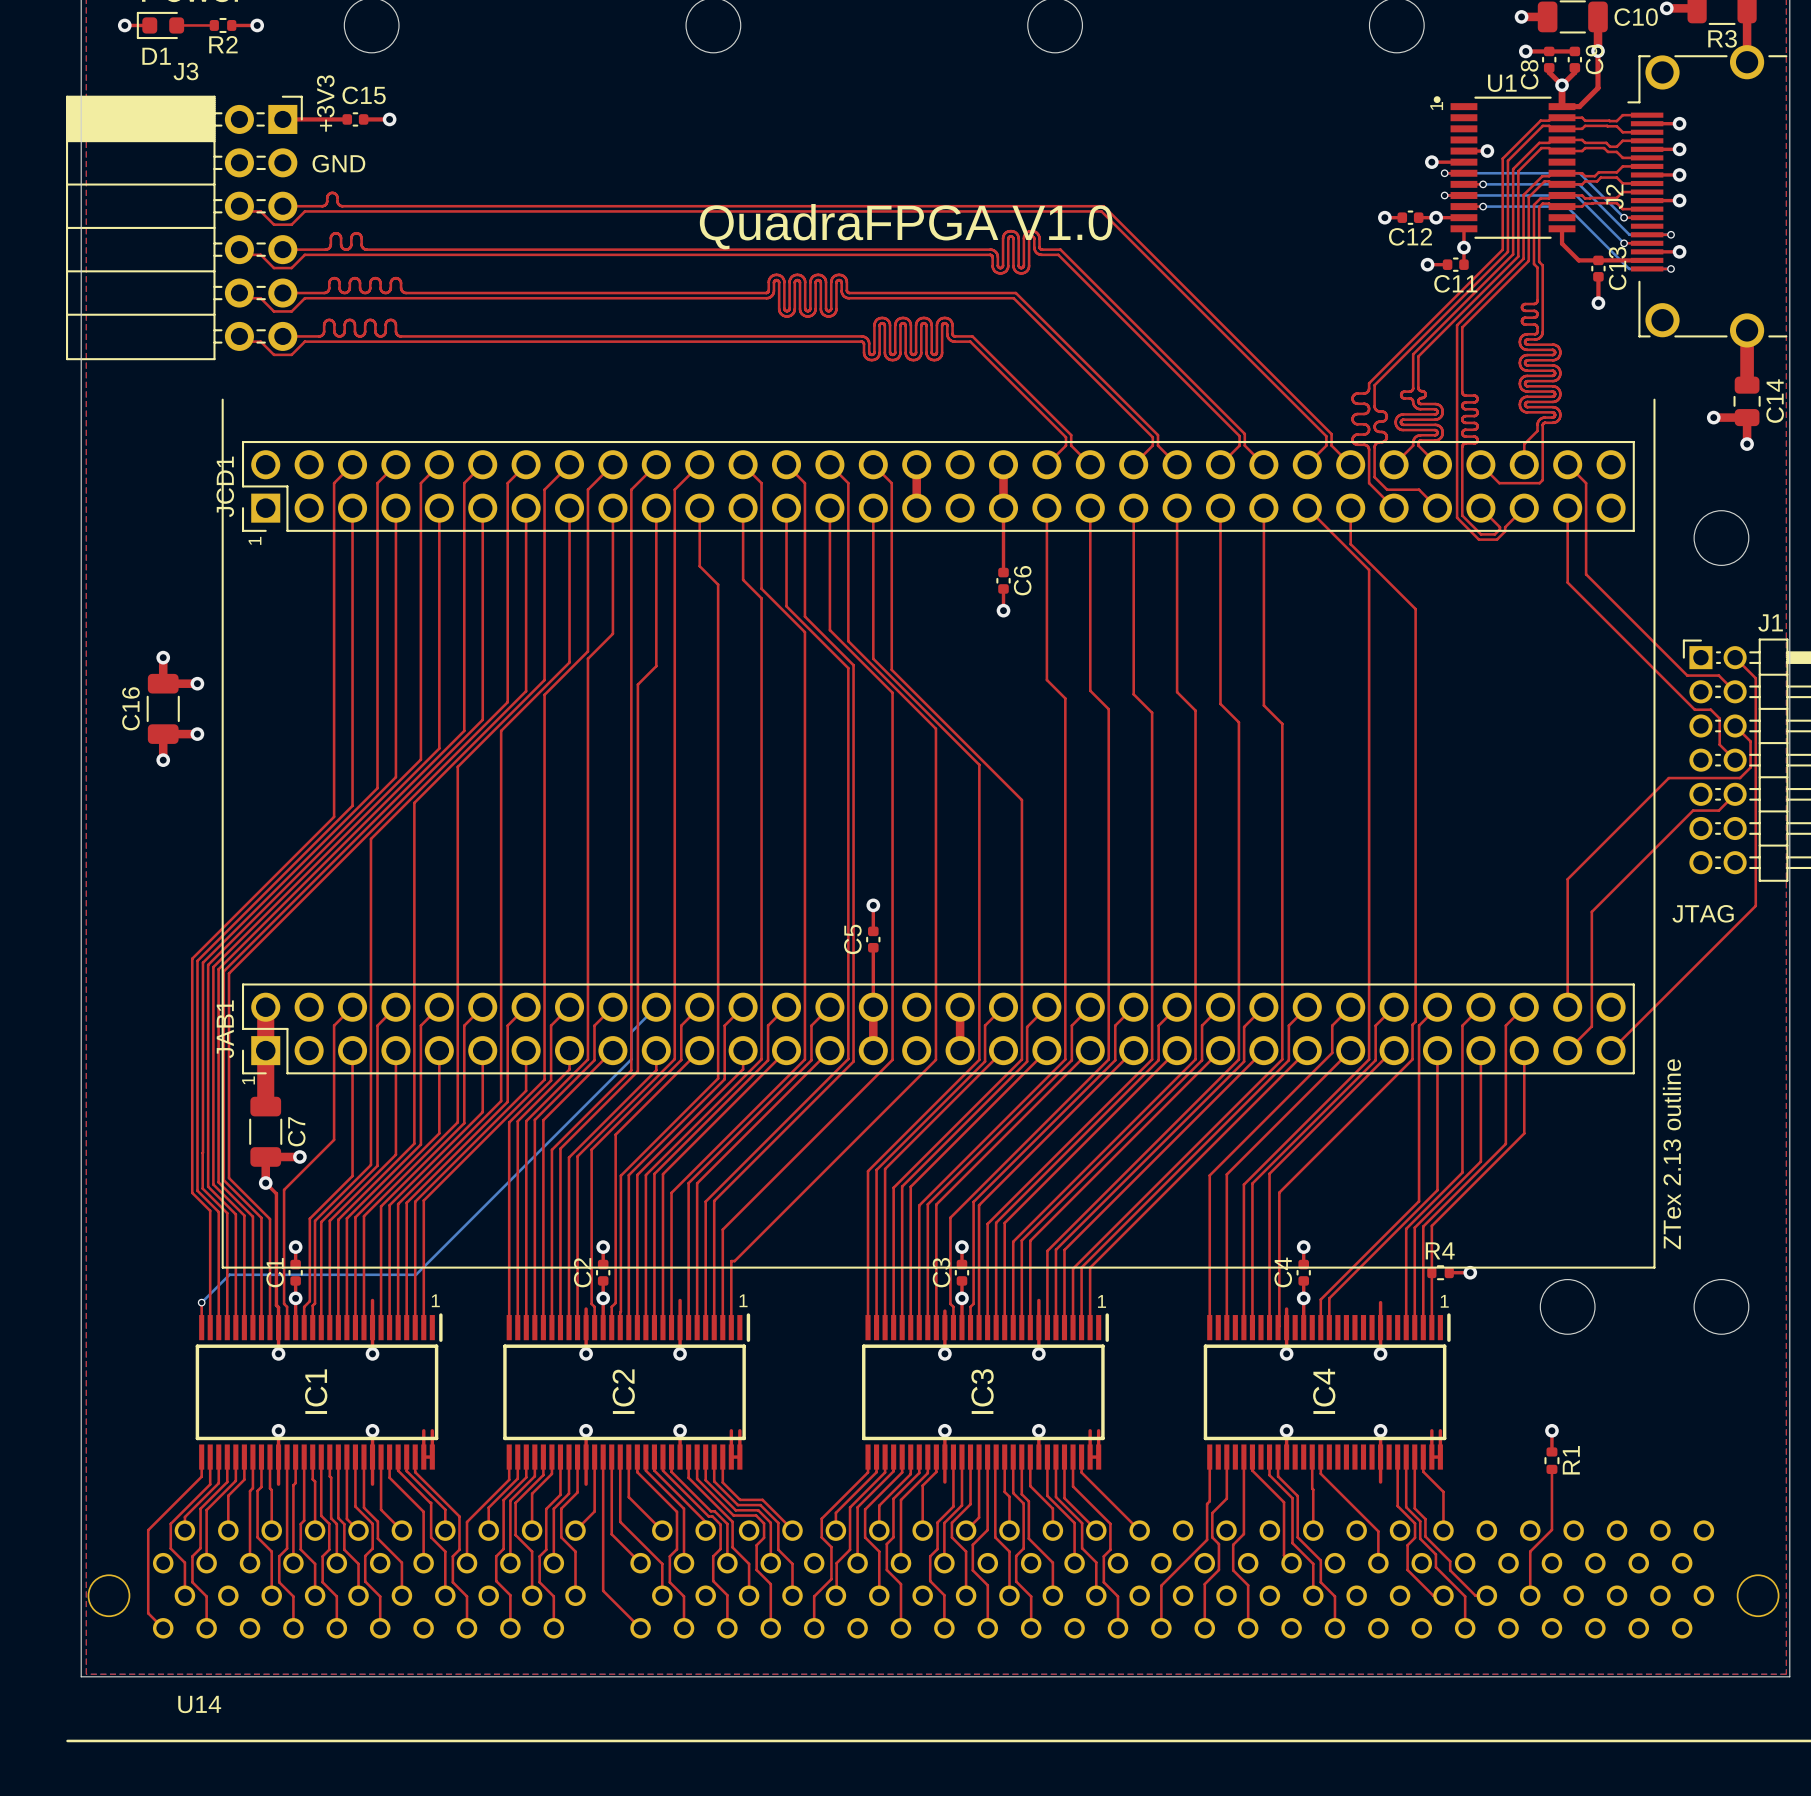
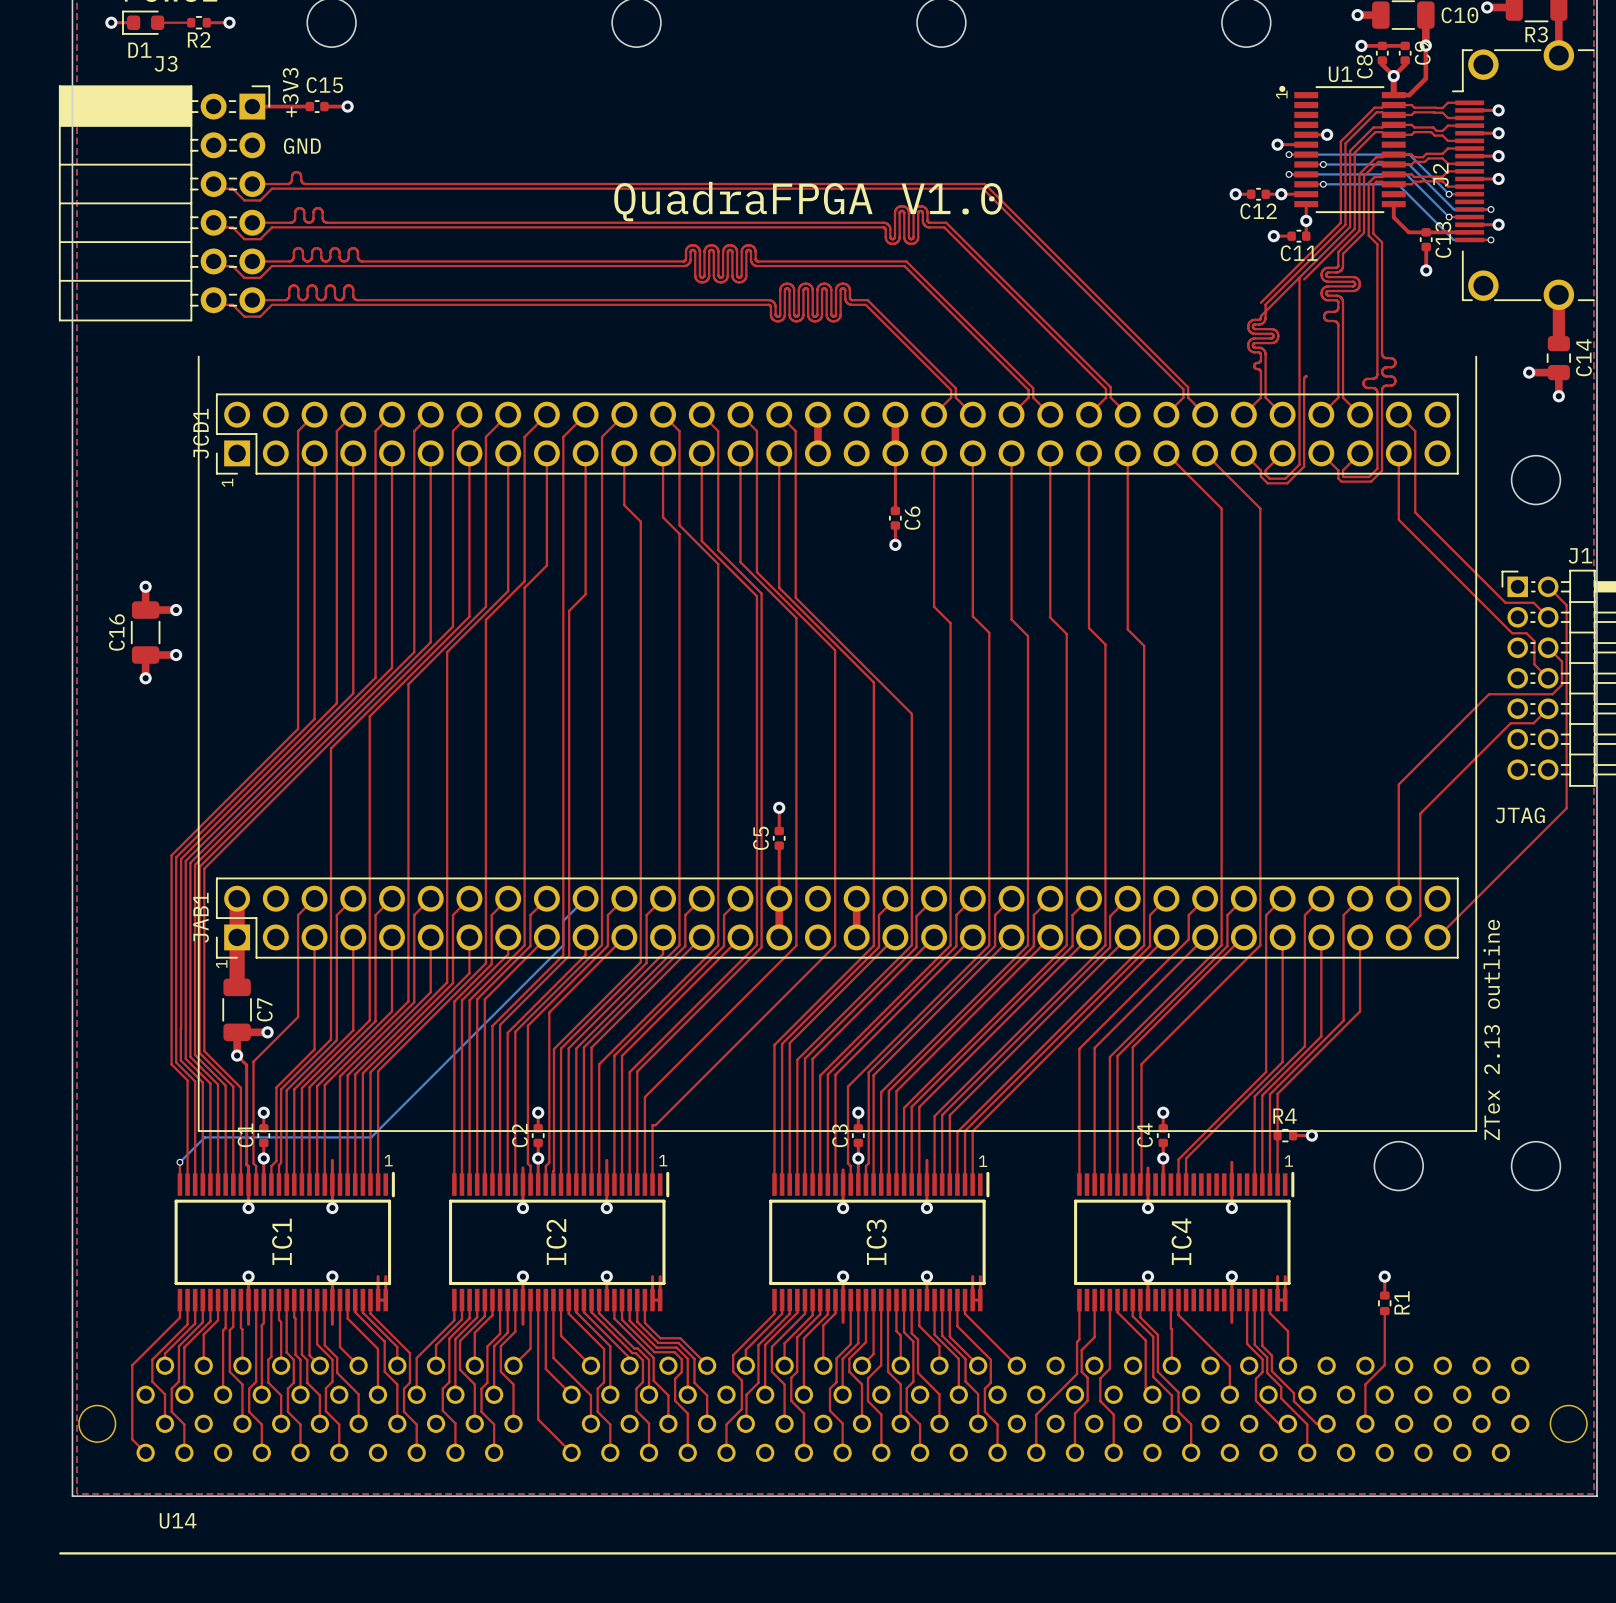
top track: (1542, 265) (1542, 333) (1538, 338) (1527, 339) (1525, 342) (1527, 344) (1554, 344) (1558, 347) (1560, 352) (1558, 357) (1554, 360) (1527, 360) (1525, 362) (1527, 365) (1554, 365) (1560, 371) (1559, 376) (1554, 380) (1527, 381) (1525, 383) (1527, 386) (1554, 386) (1560, 392) (1559, 397) (1554, 401) (1527, 401) (1525, 403) (1527, 407) (1554, 407) (1560, 412) (1557, 421) (1542, 424) (1542, 480) (1539, 483) (1499, 483) (1480, 464) -> (1338, 251) (1338, 266) (1324, 269) (1321, 272) (1322, 278) (1326, 281) (1352, 281) (1355, 284) (1352, 286) (1326, 286) (1321, 291) (1324, 298) (1338, 302) (1337, 310) (1326, 312) (1324, 316) (1326, 320) (1334, 321) (1338, 324) (1338, 397) (1321, 414)
top track: (1537, 267) (1537, 302) (1523, 304) (1521, 307) (1523, 310) (1537, 312) (1535, 317) (1524, 317) (1521, 321) (1524, 324) (1536, 325) (1537, 332) (1522, 335) (1520, 344) (1525, 349) (1553, 349) (1555, 353) (1552, 355) (1525, 355) (1520, 359) (1520, 364) (1525, 370) (1553, 370) (1555, 373) (1552, 375) (1525, 376) (1520, 380) (1520, 385) (1525, 391) (1553, 391) (1555, 394) (1552, 396) (1525, 396) (1520, 400) (1520, 406) (1525, 412) (1552, 412) (1555, 414) (1553, 417) (1540, 419) (1537, 423) (1537, 430) (1524, 444) (1524, 464) -> (1343, 253) (1341, 269) (1337, 272) (1327, 272) (1326, 275) (1356, 277) (1359, 282) (1359, 287) (1354, 290) (1328, 291) (1326, 293) (1328, 295) (1339, 296) (1342, 300) (1343, 397) (1360, 414)
top track: (1499, 282) (1457, 325) (1457, 517) (1478, 539) (1496, 539) (1505, 531) -> (1371, 238) (1377, 244) (1377, 374) (1374, 378) (1365, 379) (1363, 383) (1365, 387) (1374, 388) (1377, 391) (1377, 468) (1369, 476) (1343, 476) (1343, 474)
top track: (1505, 284) (1462, 327) (1462, 392) (1464, 395) (1475, 395) (1477, 399) (1475, 402) (1464, 402) (1462, 405) (1464, 408) (1474, 409) (1477, 412) (1474, 416) (1463, 417) (1464, 422) (1474, 423) (1477, 426) (1474, 429) (1464, 430) (1462, 434) (1475, 436) (1477, 440) (1475, 443) (1464, 443) (1462, 446) (1462, 515) (1481, 534) (1494, 534) (1499, 529) -> (1376, 236) (1382, 242) (1382, 354) (1384, 357) (1392, 358) (1395, 362) (1392, 366) (1384, 367) (1382, 370) (1383, 375) (1392, 376) (1395, 381) (1392, 385) (1384, 386) (1382, 389) (1382, 470) (1371, 481) (1341, 481) (1338, 478) (1338, 472)
top track: (1461, 313) (1418, 356) (1418, 388) (1425, 394) (1419, 399) (1418, 402) (1438, 404) (1442, 411) (1441, 416) (1436, 419) (1401, 420) (1402, 424) (1435, 424) (1441, 427) (1442, 433) (1439, 438) (1420, 440) (1418, 443) -> (1265, 304) (1264, 320) (1252, 326) (1254, 329) (1273, 329) (1278, 334) (1277, 339) (1274, 342) (1254, 343) (1252, 344) (1254, 347) (1263, 349) (1265, 352) (1265, 395)
top track: (1413, 339) (1369, 383) (1367, 392) (1355, 394) (1352, 397) (1354, 402) (1366, 404) (1369, 408) (1366, 413) (1356, 414) (1353, 416) (1354, 423) (1366, 424) (1369, 429) (1366, 434) (1354, 435) (1353, 441) (1368, 447) (1369, 483) (1394, 508) -> (1306, 376) (1304, 378) (1304, 466) (1287, 483) (1267, 483) (1260, 476) (1260, 470) (1243, 453)
top track: (1418, 341) (1374, 385) (1375, 408) (1384, 412) (1386, 416) (1384, 420) (1377, 422) (1374, 425) (1376, 430) (1383, 432) (1386, 437) (1384, 441) (1377, 442) (1374, 446) (1374, 477) (1387, 489) (1419, 489) (1437, 508) -> (1299, 277) (1299, 464) (1285, 478) (1269, 478) (1265, 474) (1265, 470) (1282, 453)
top track: (1413, 355) (1413, 388) (1410, 391) (1402, 392) (1401, 396) (1411, 399) (1417, 408) (1435, 409) (1437, 411) (1435, 414) (1403, 414) (1397, 417) (1395, 424) (1399, 429) (1437, 431) (1435, 435) (1417, 436) (1413, 442) -> (1260, 317) (1259, 319) (1250, 321) (1248, 326) (1251, 333) (1271, 333) (1273, 335) (1271, 338) (1253, 338) (1248, 343) (1250, 350) (1260, 354) (1260, 361) (1254, 366) (1260, 371) (1260, 394)
top track: (1350, 508) (1350, 544) (1415, 609) (1415, 1021) (1412, 1024) -> (1205, 453) (1260, 508) (1260, 914)

